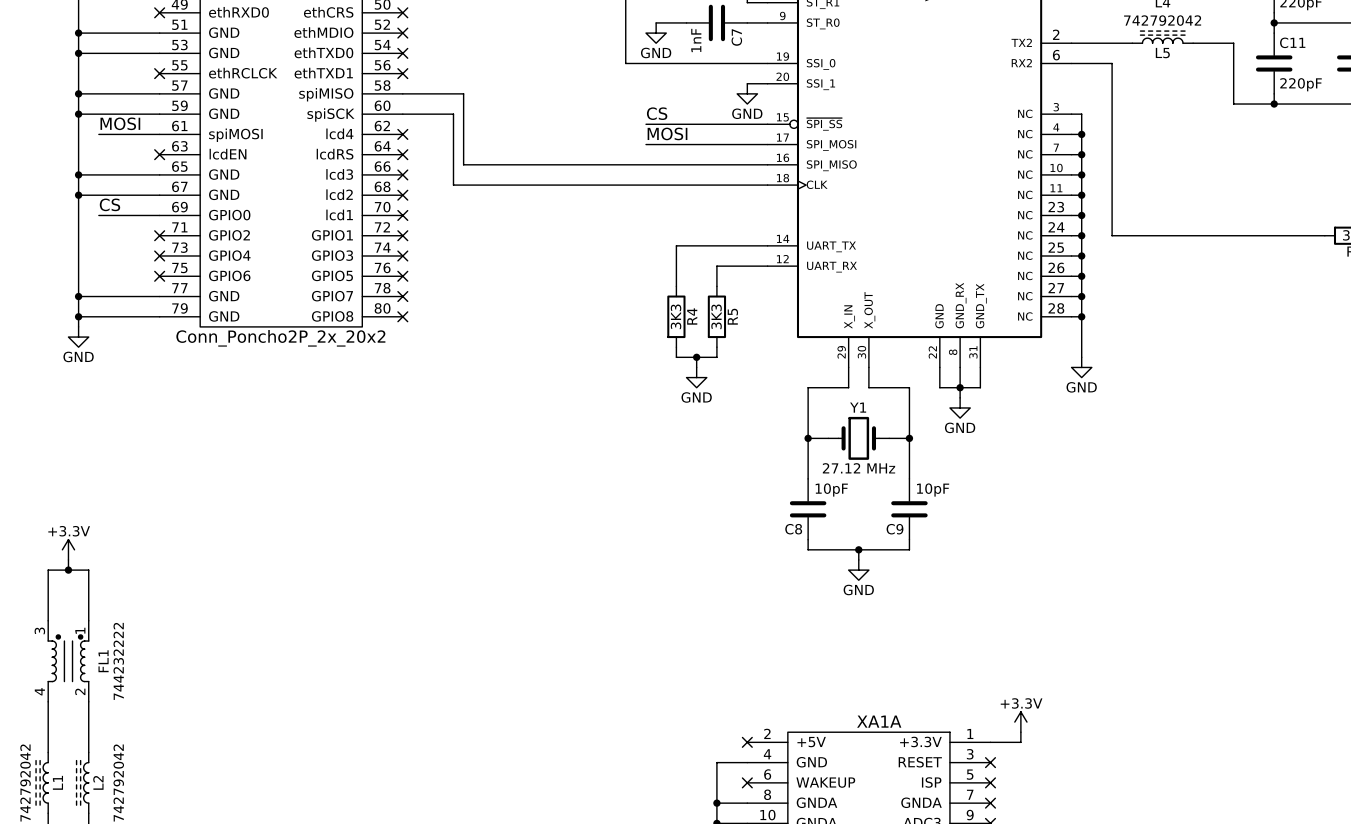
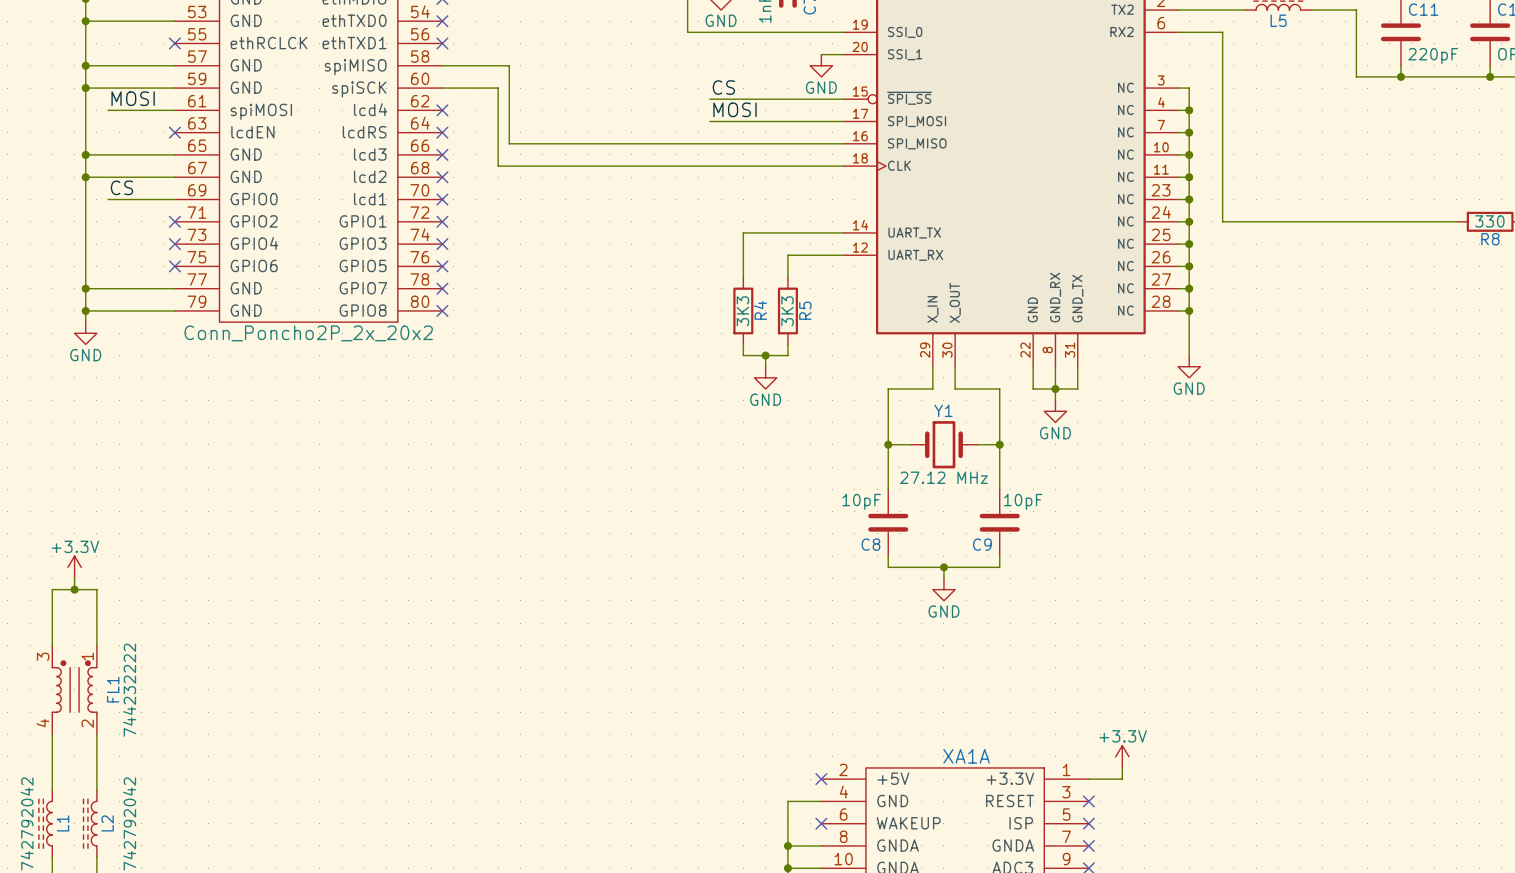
C8 value position: 10pF (831, 490) -> 10pF (861, 501)

